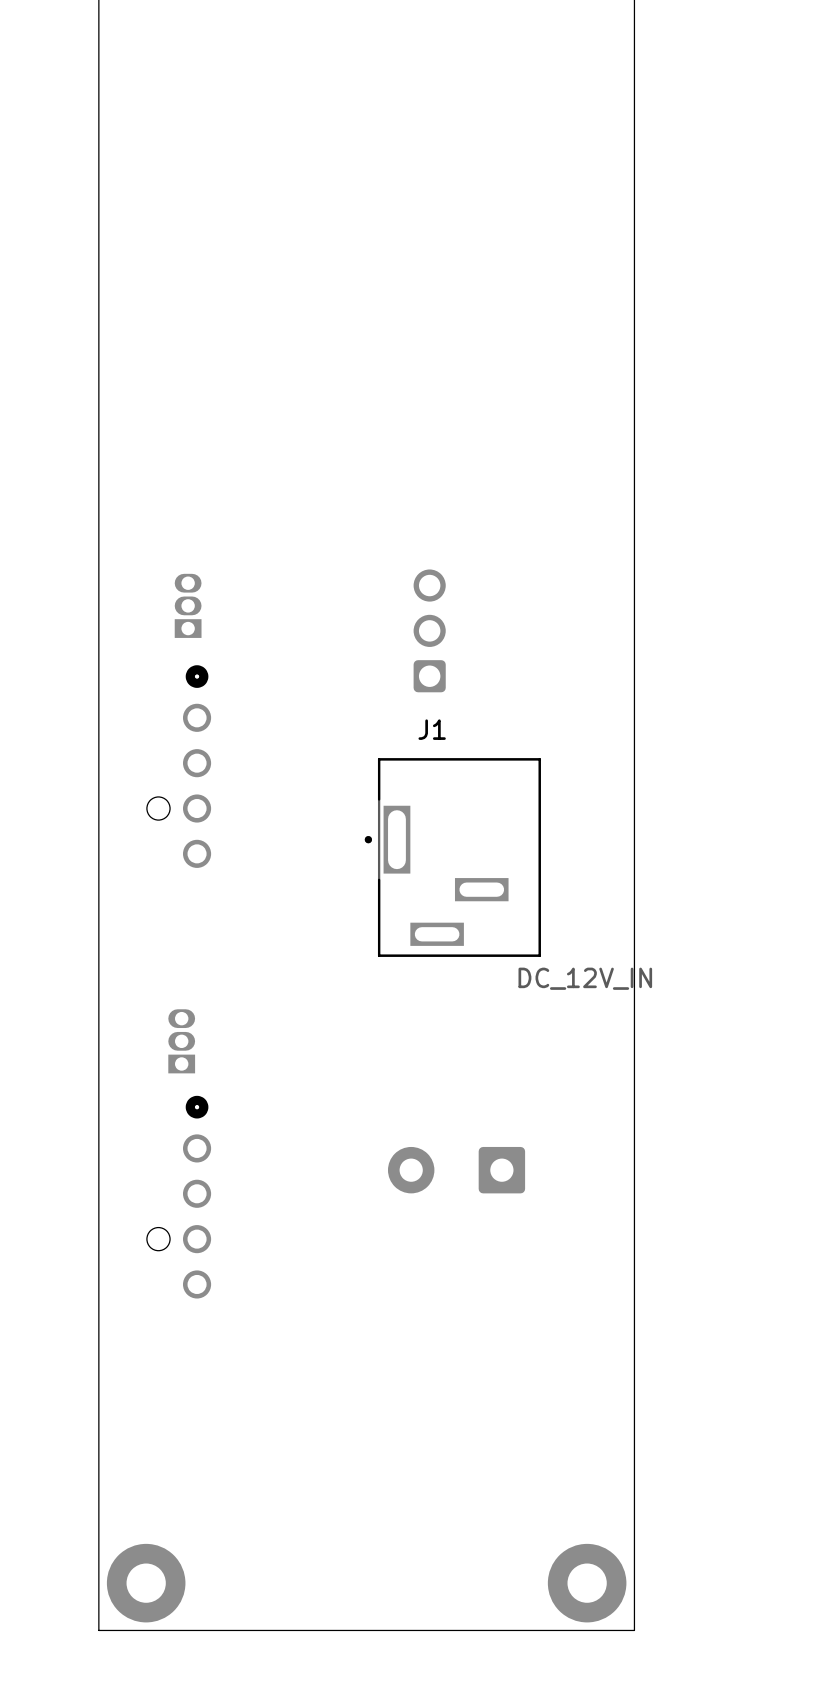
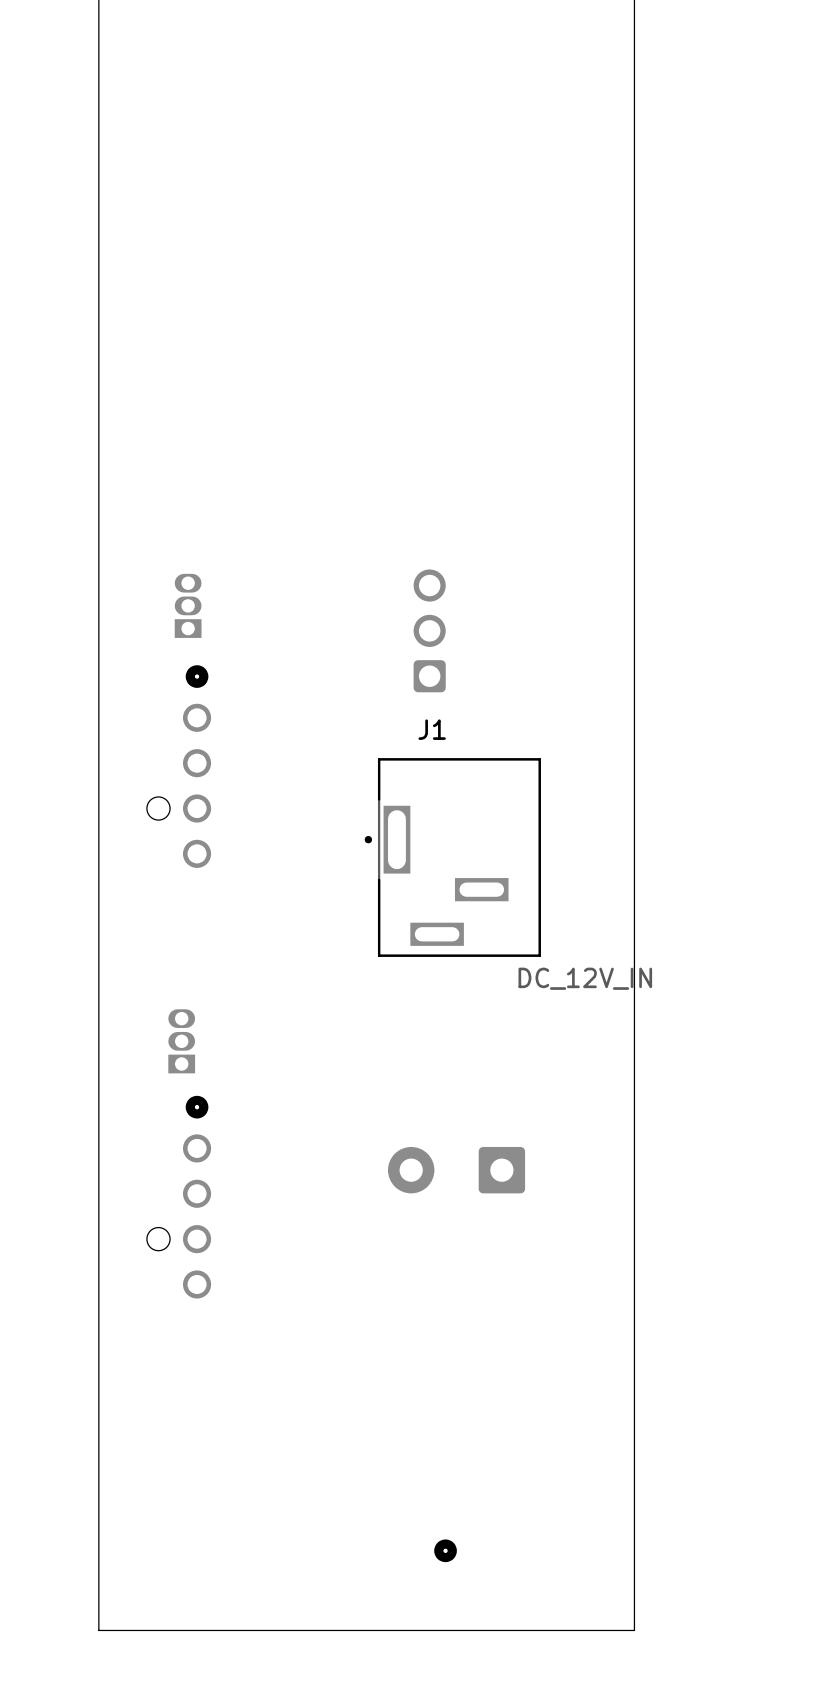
part: none -> (445, 1550)
part: (146, 1583) -> none
part: (587, 1583) -> none

